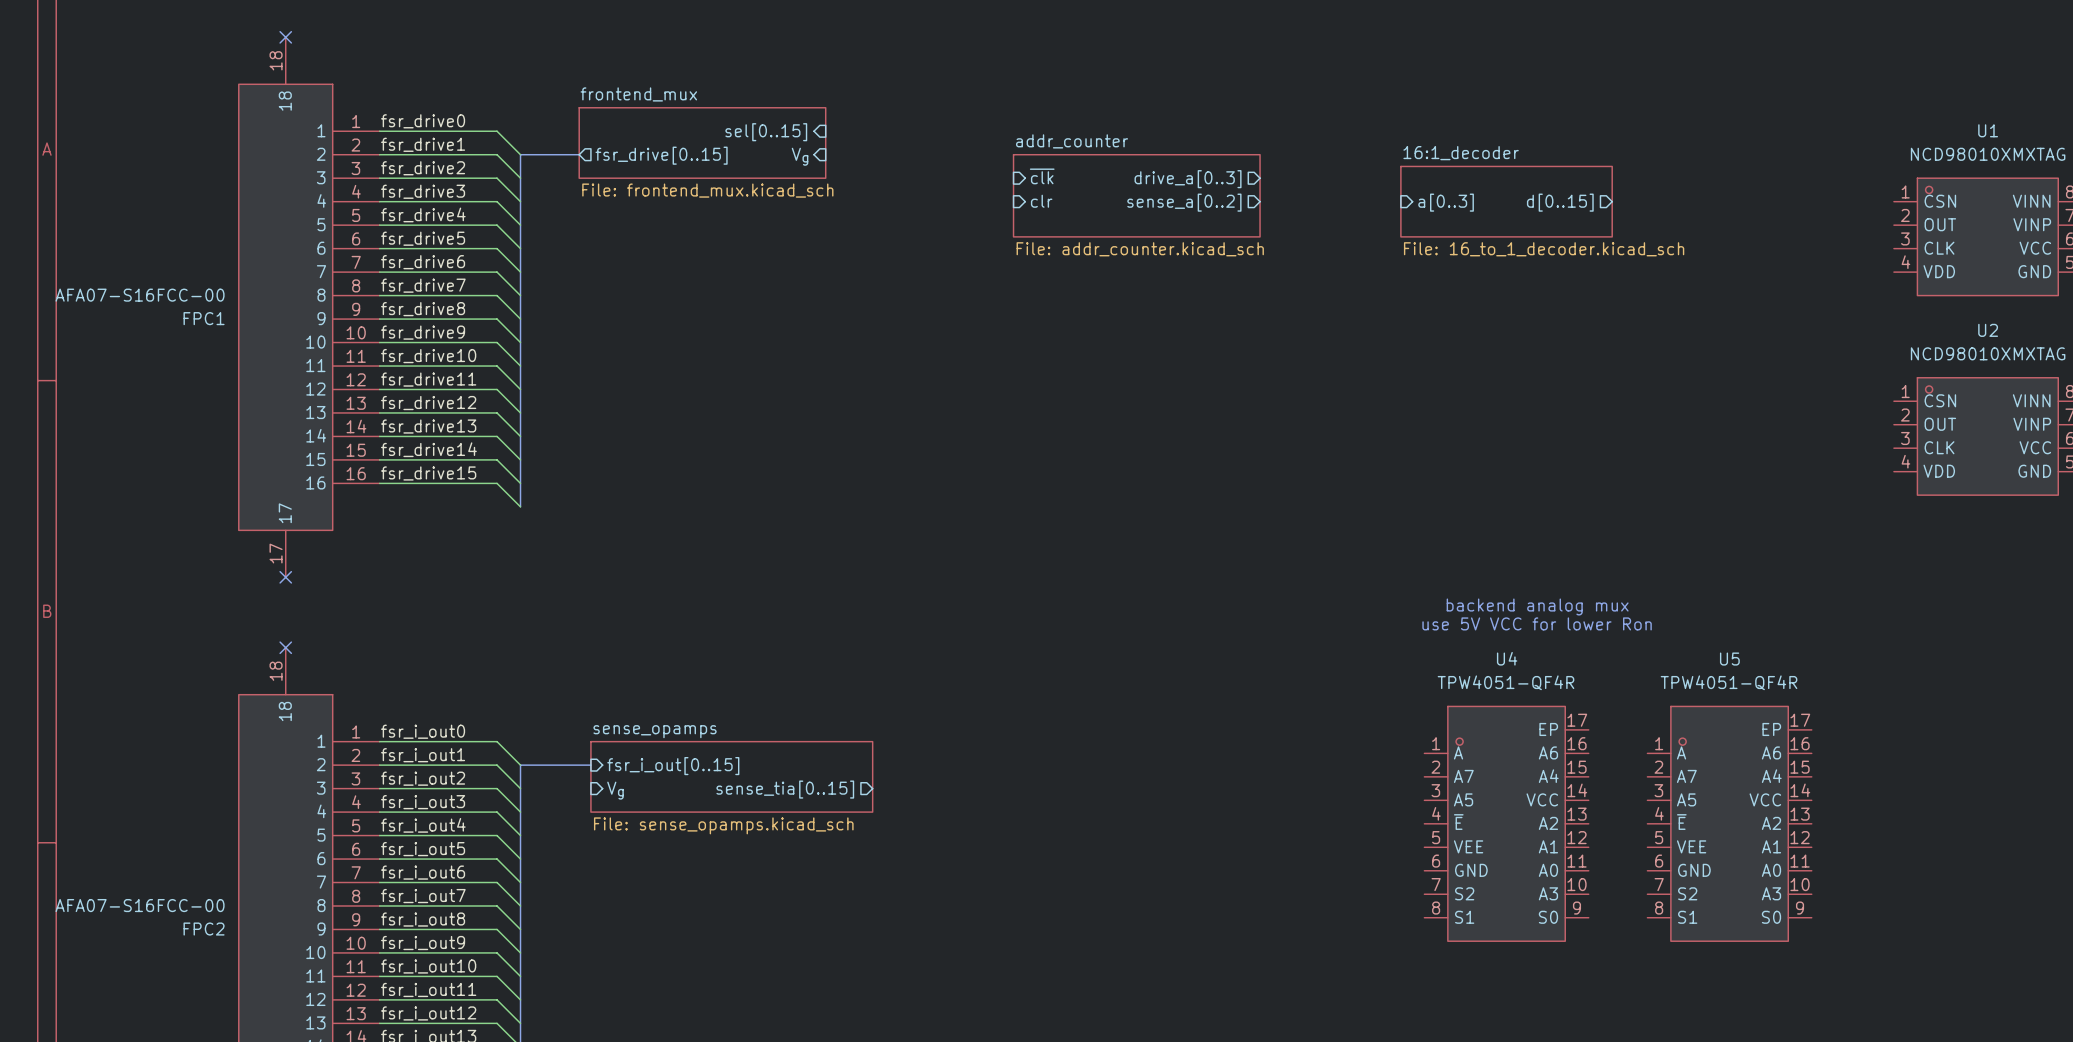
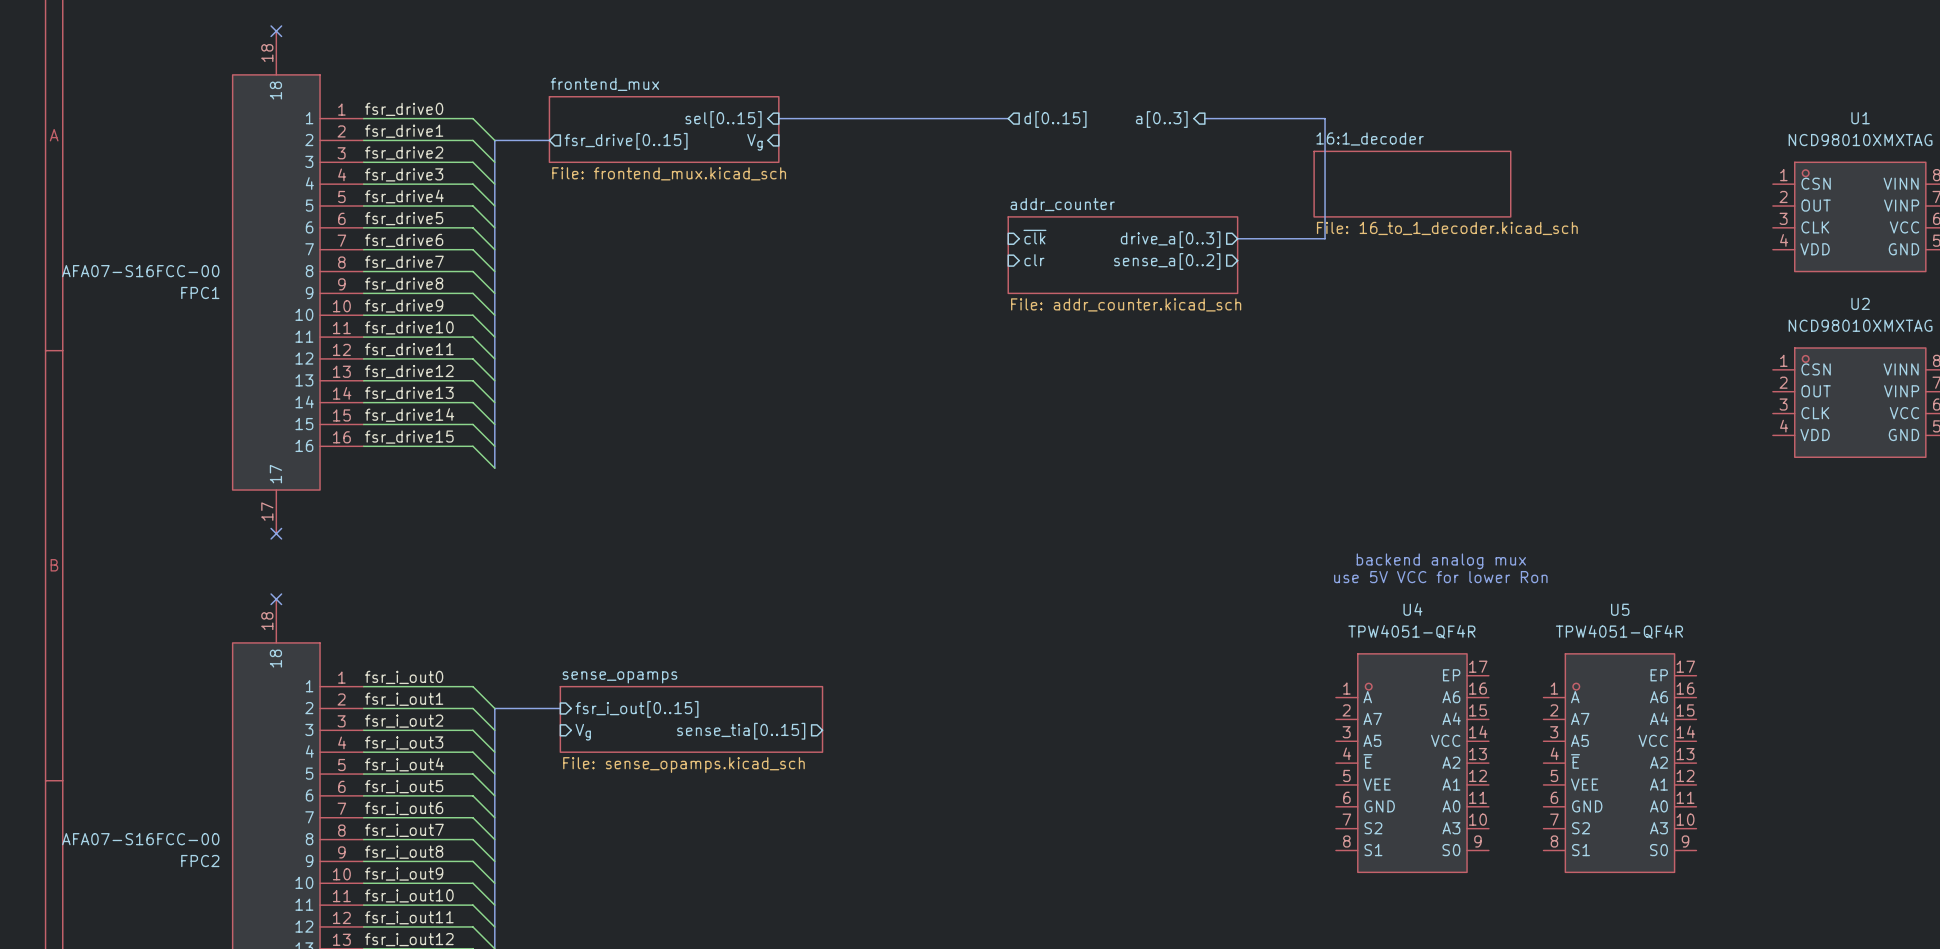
bus: none -> (778, 118) (1008, 118)
bus: none -> (1204, 118) (1325, 118) (1325, 238) (1237, 238)
sheet pin: none -> d[0..15] (1055, 119)
sheet pin position: ~{clk} (1042, 176) -> ~{clk} (1034, 237)
sheet pin position: drive_a[0..3] (1188, 179) -> drive_a[0..3] (1170, 239)
sheet addr_counter position: (1136, 195) -> (1122, 255)
sheet pin position: clr (1041, 201) -> clr (1034, 260)
sheet pin position: sense_a[0..2] (1184, 202) -> sense_a[0..2] (1167, 261)
sheet pin rotation: 0° (1446, 202) -> 180° (1161, 119)
sheet pin position: a[0..3] (1446, 202) -> a[0..3] (1161, 119)
sheet pin: d[0..15] (1560, 202) -> none

